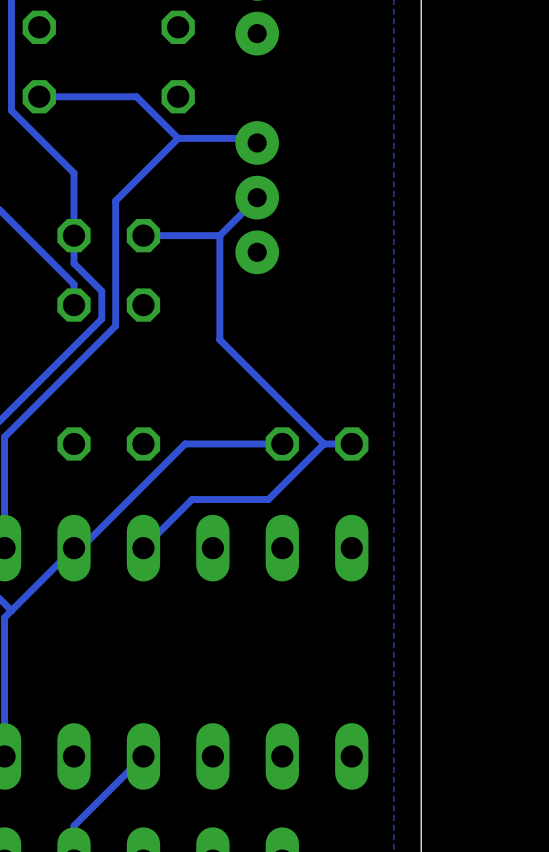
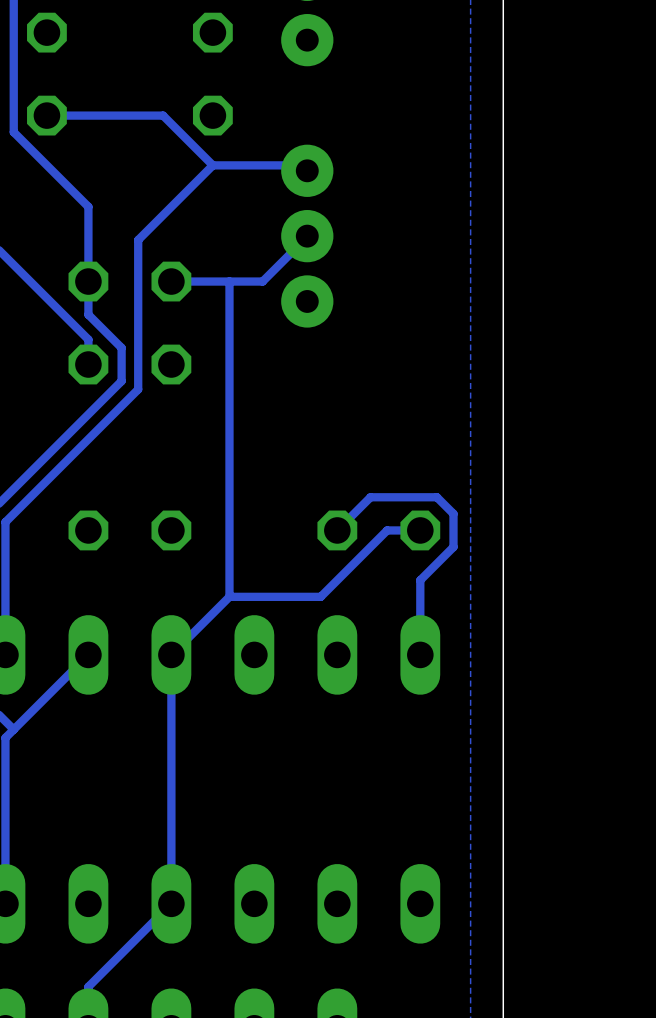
track: none -> (229, 281) (229, 596)
track: (219, 235) (219, 339) (324, 443) -> none
track: (282, 443) (185, 443) (80, 548) (74, 548) -> (337, 530) (370, 497) (436, 497) (453, 513) (453, 547) (420, 580) (420, 654)
track: none -> (171, 654) (171, 903)

